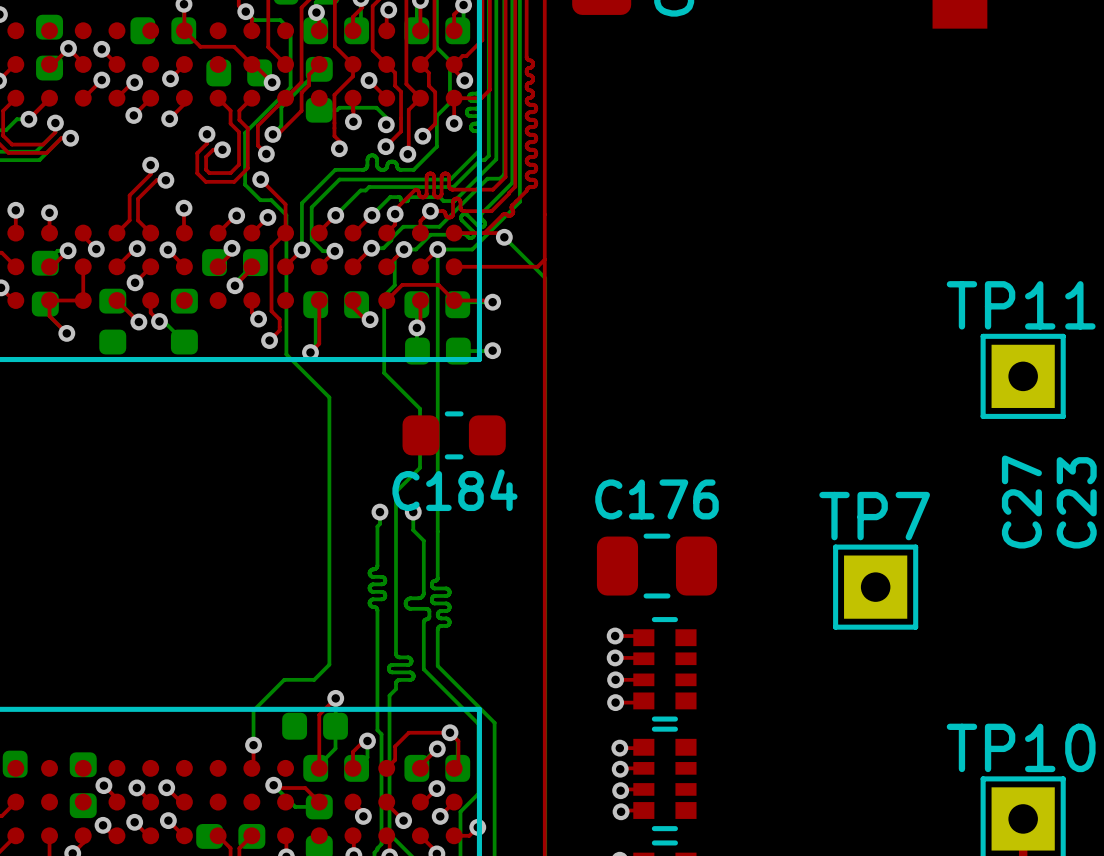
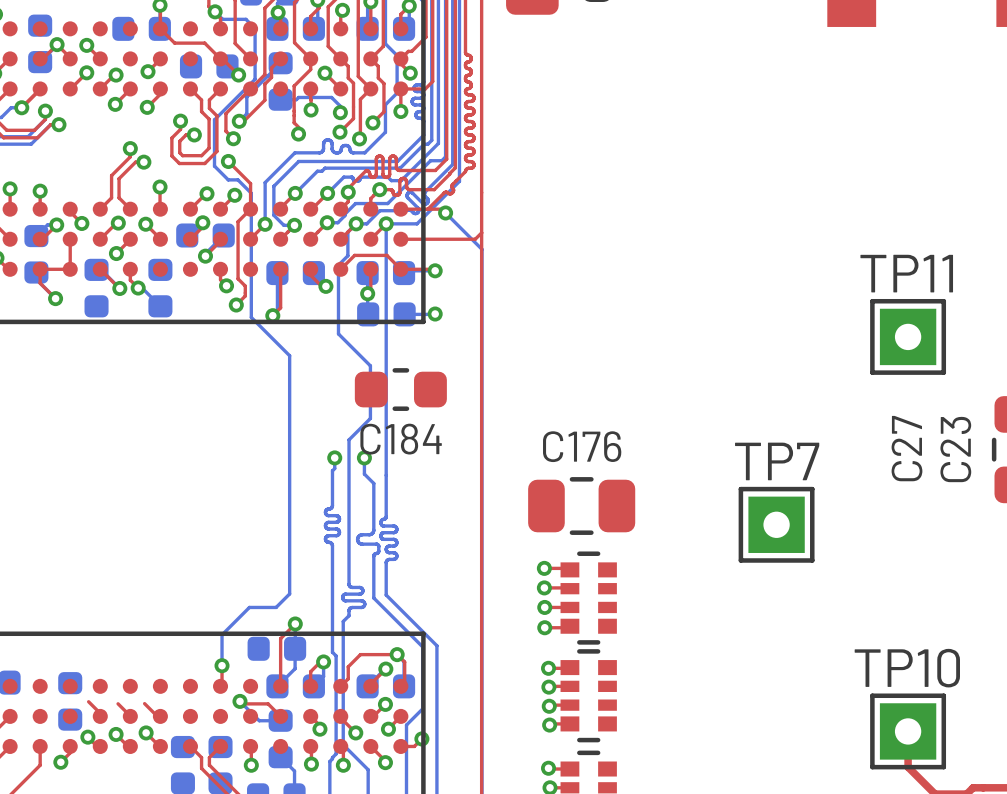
via: (103, 785) -> none
via: (136, 787) -> none
via: (166, 787) -> none

